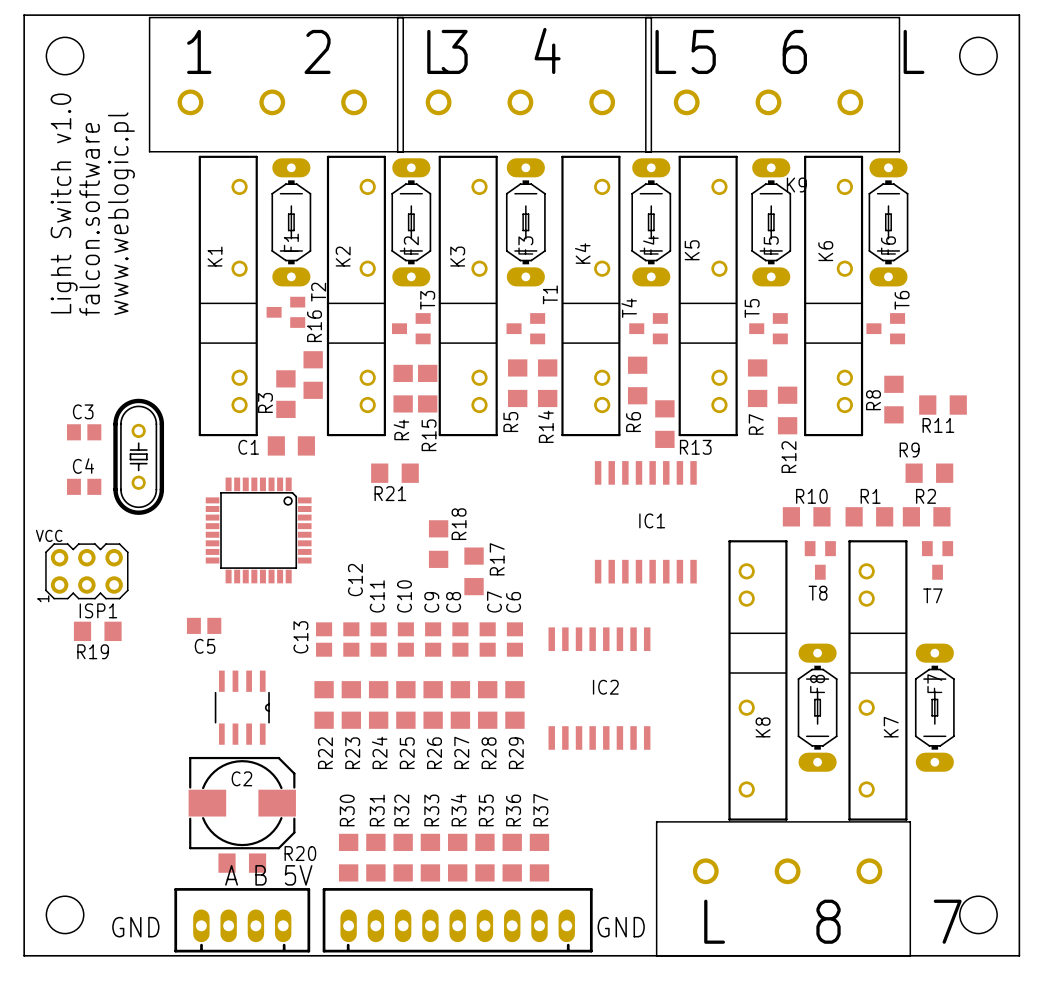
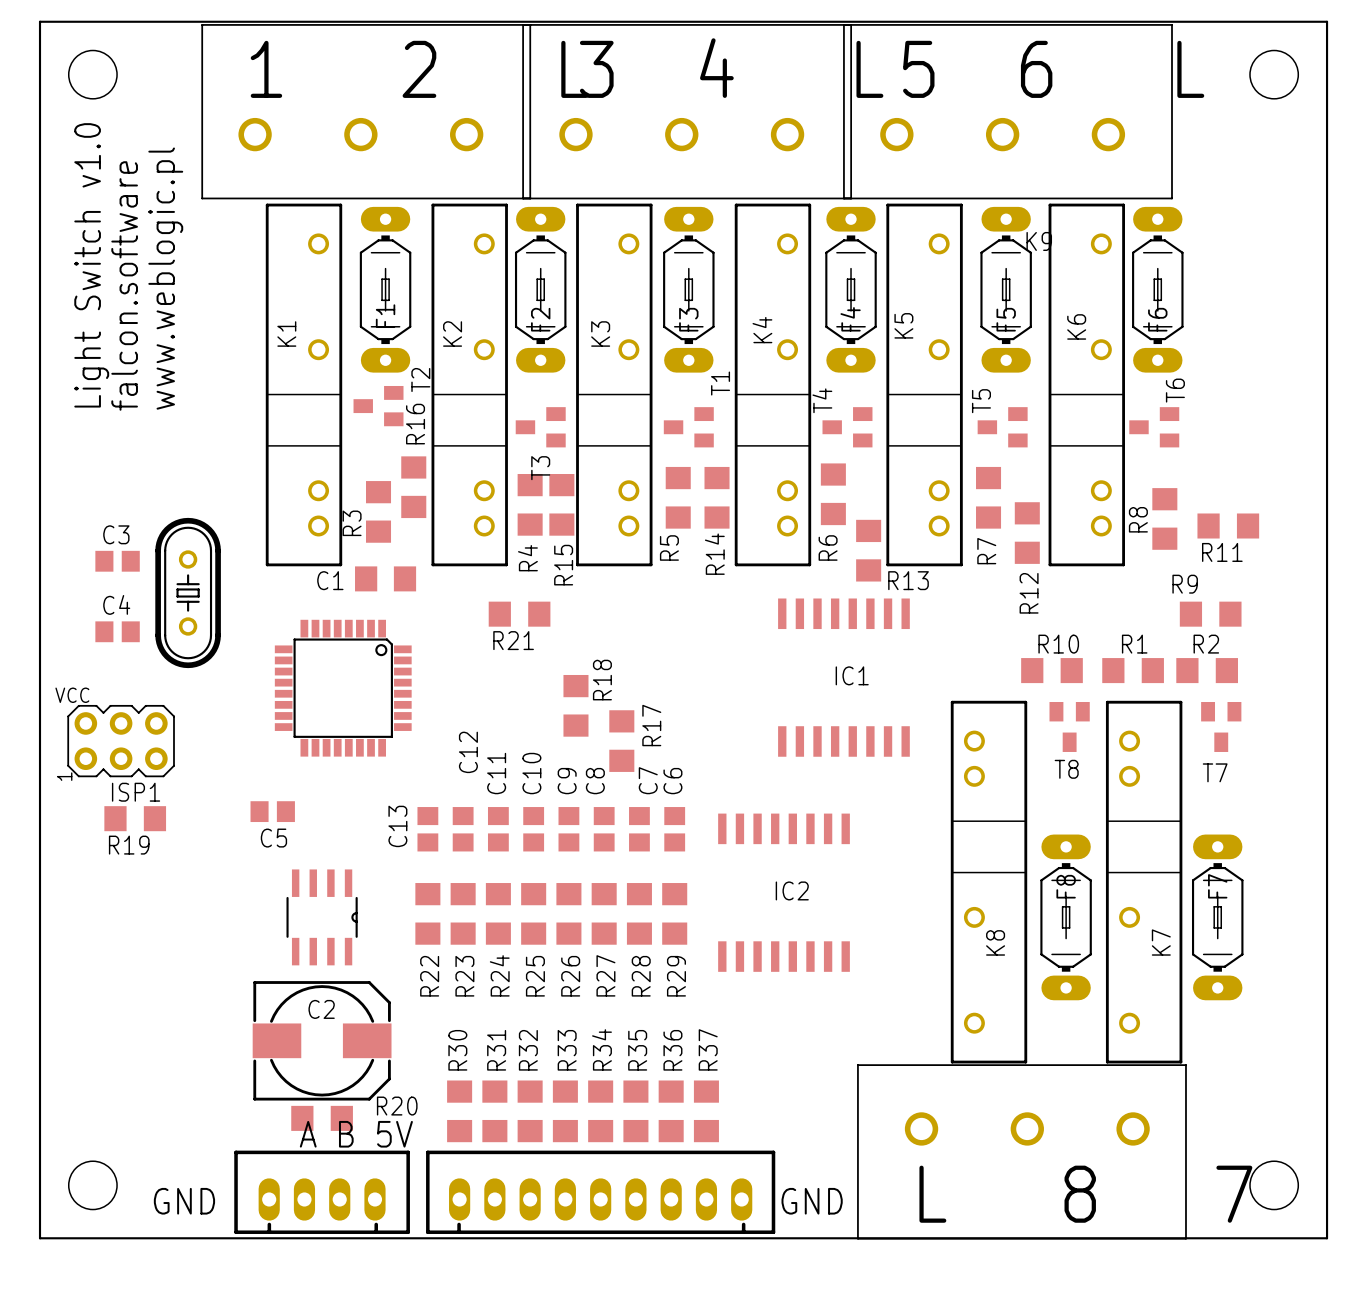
T3 name position: T3 (427, 300) -> T3 (540, 468)

